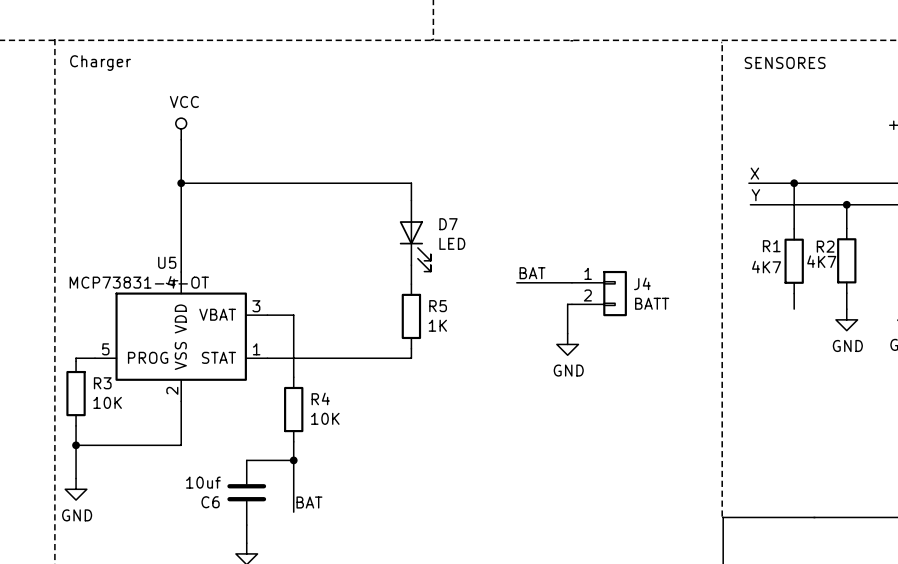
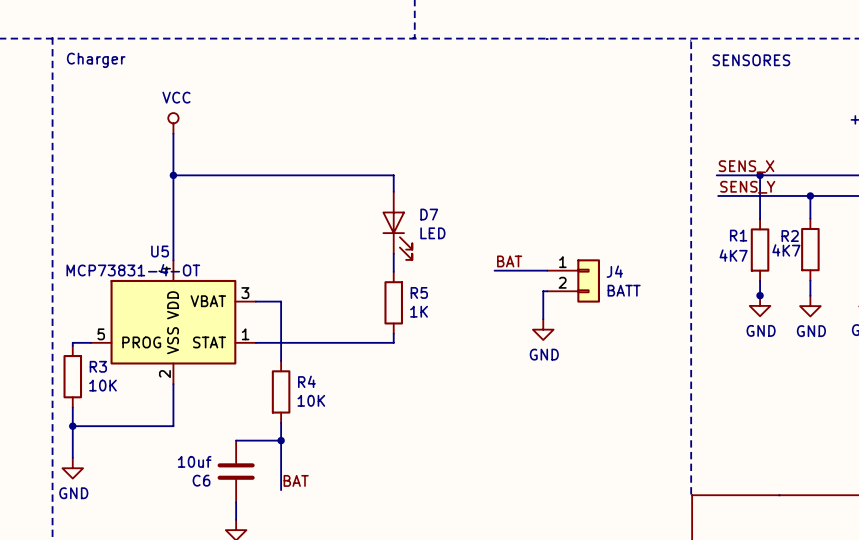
label: X (754, 173) -> SENS_X (746, 166)
label: Y (755, 195) -> SENS_Y (747, 187)
junction: none -> (760, 295)
power symbol: none -> GND (760, 305)

